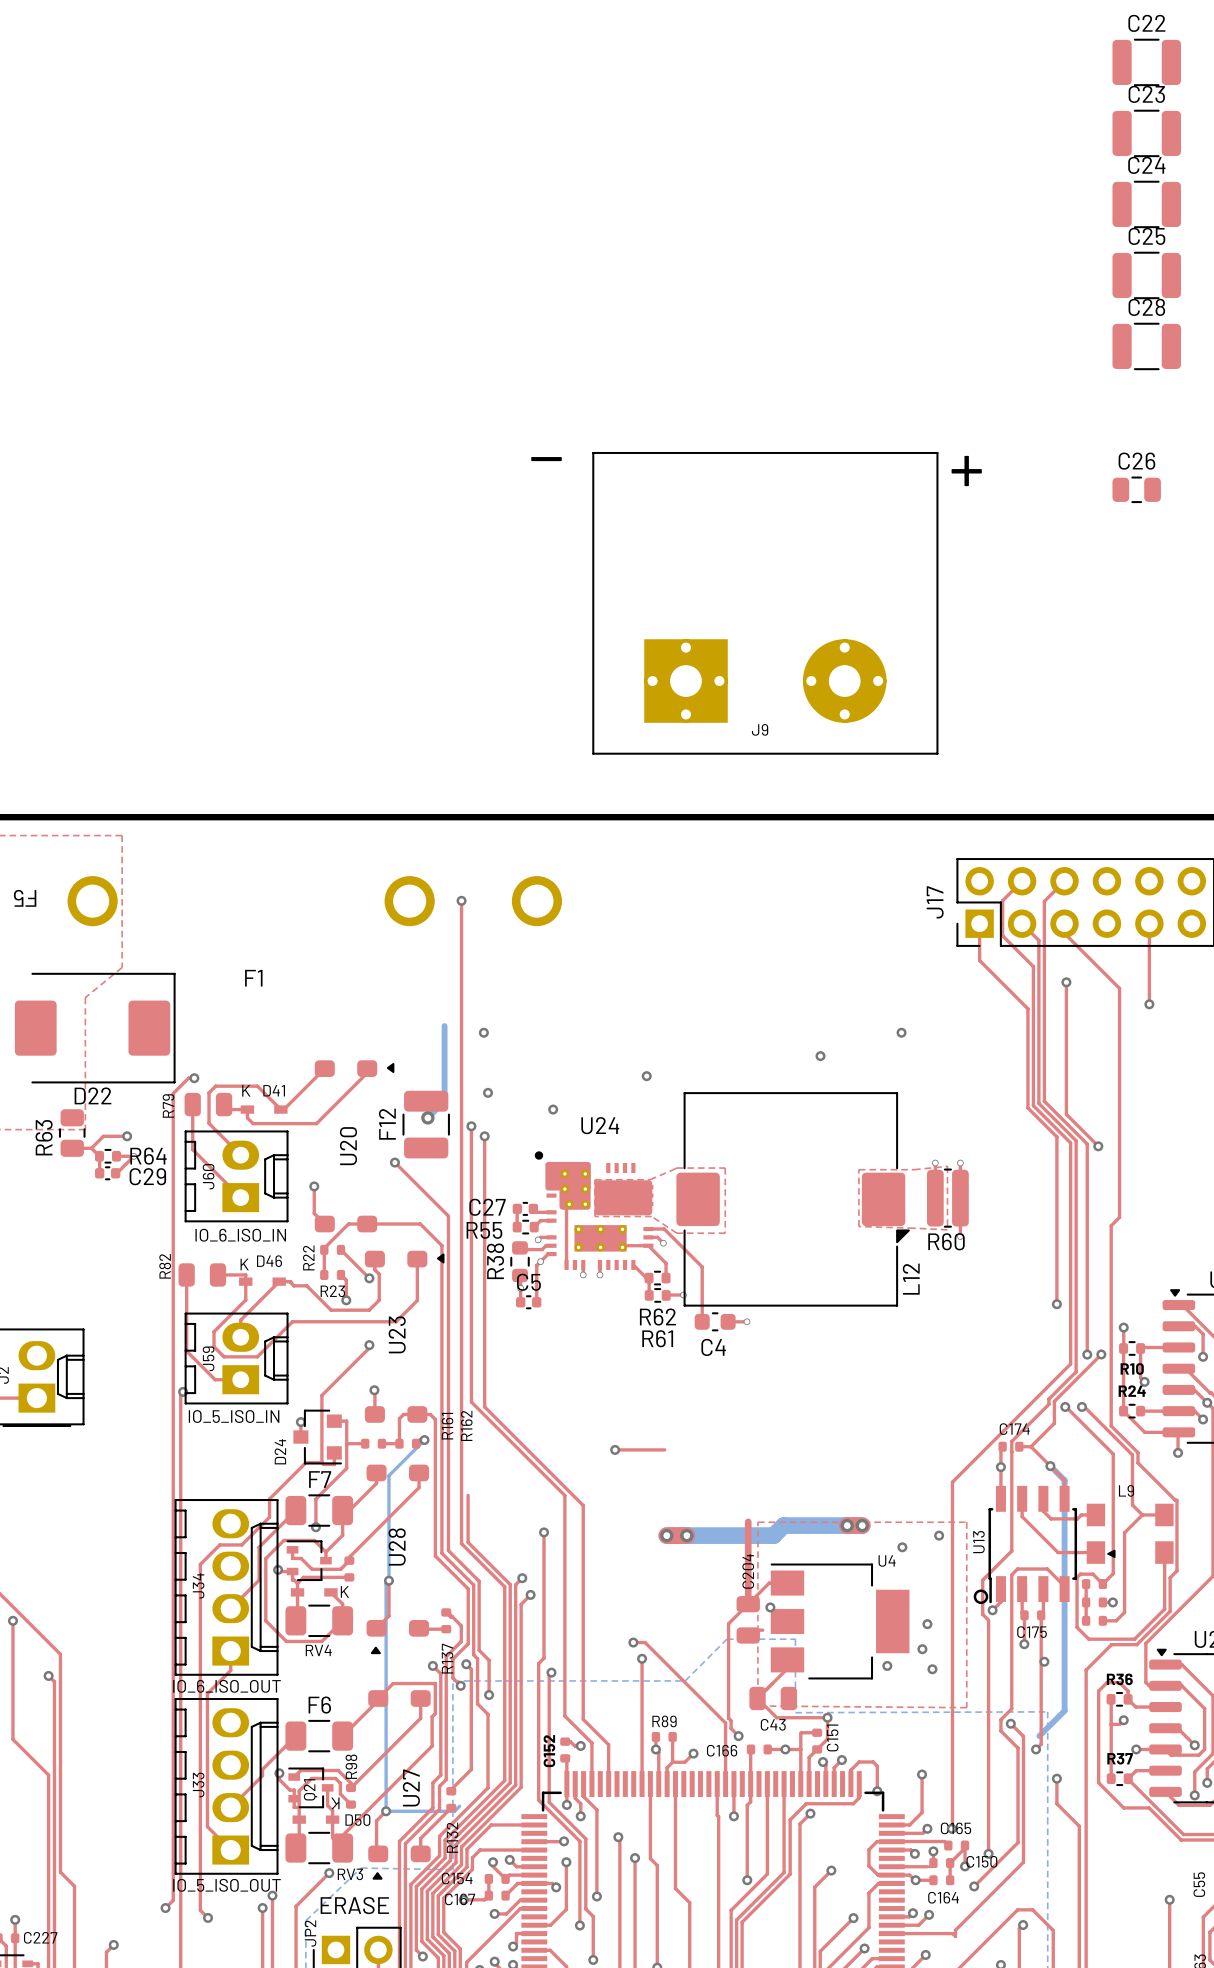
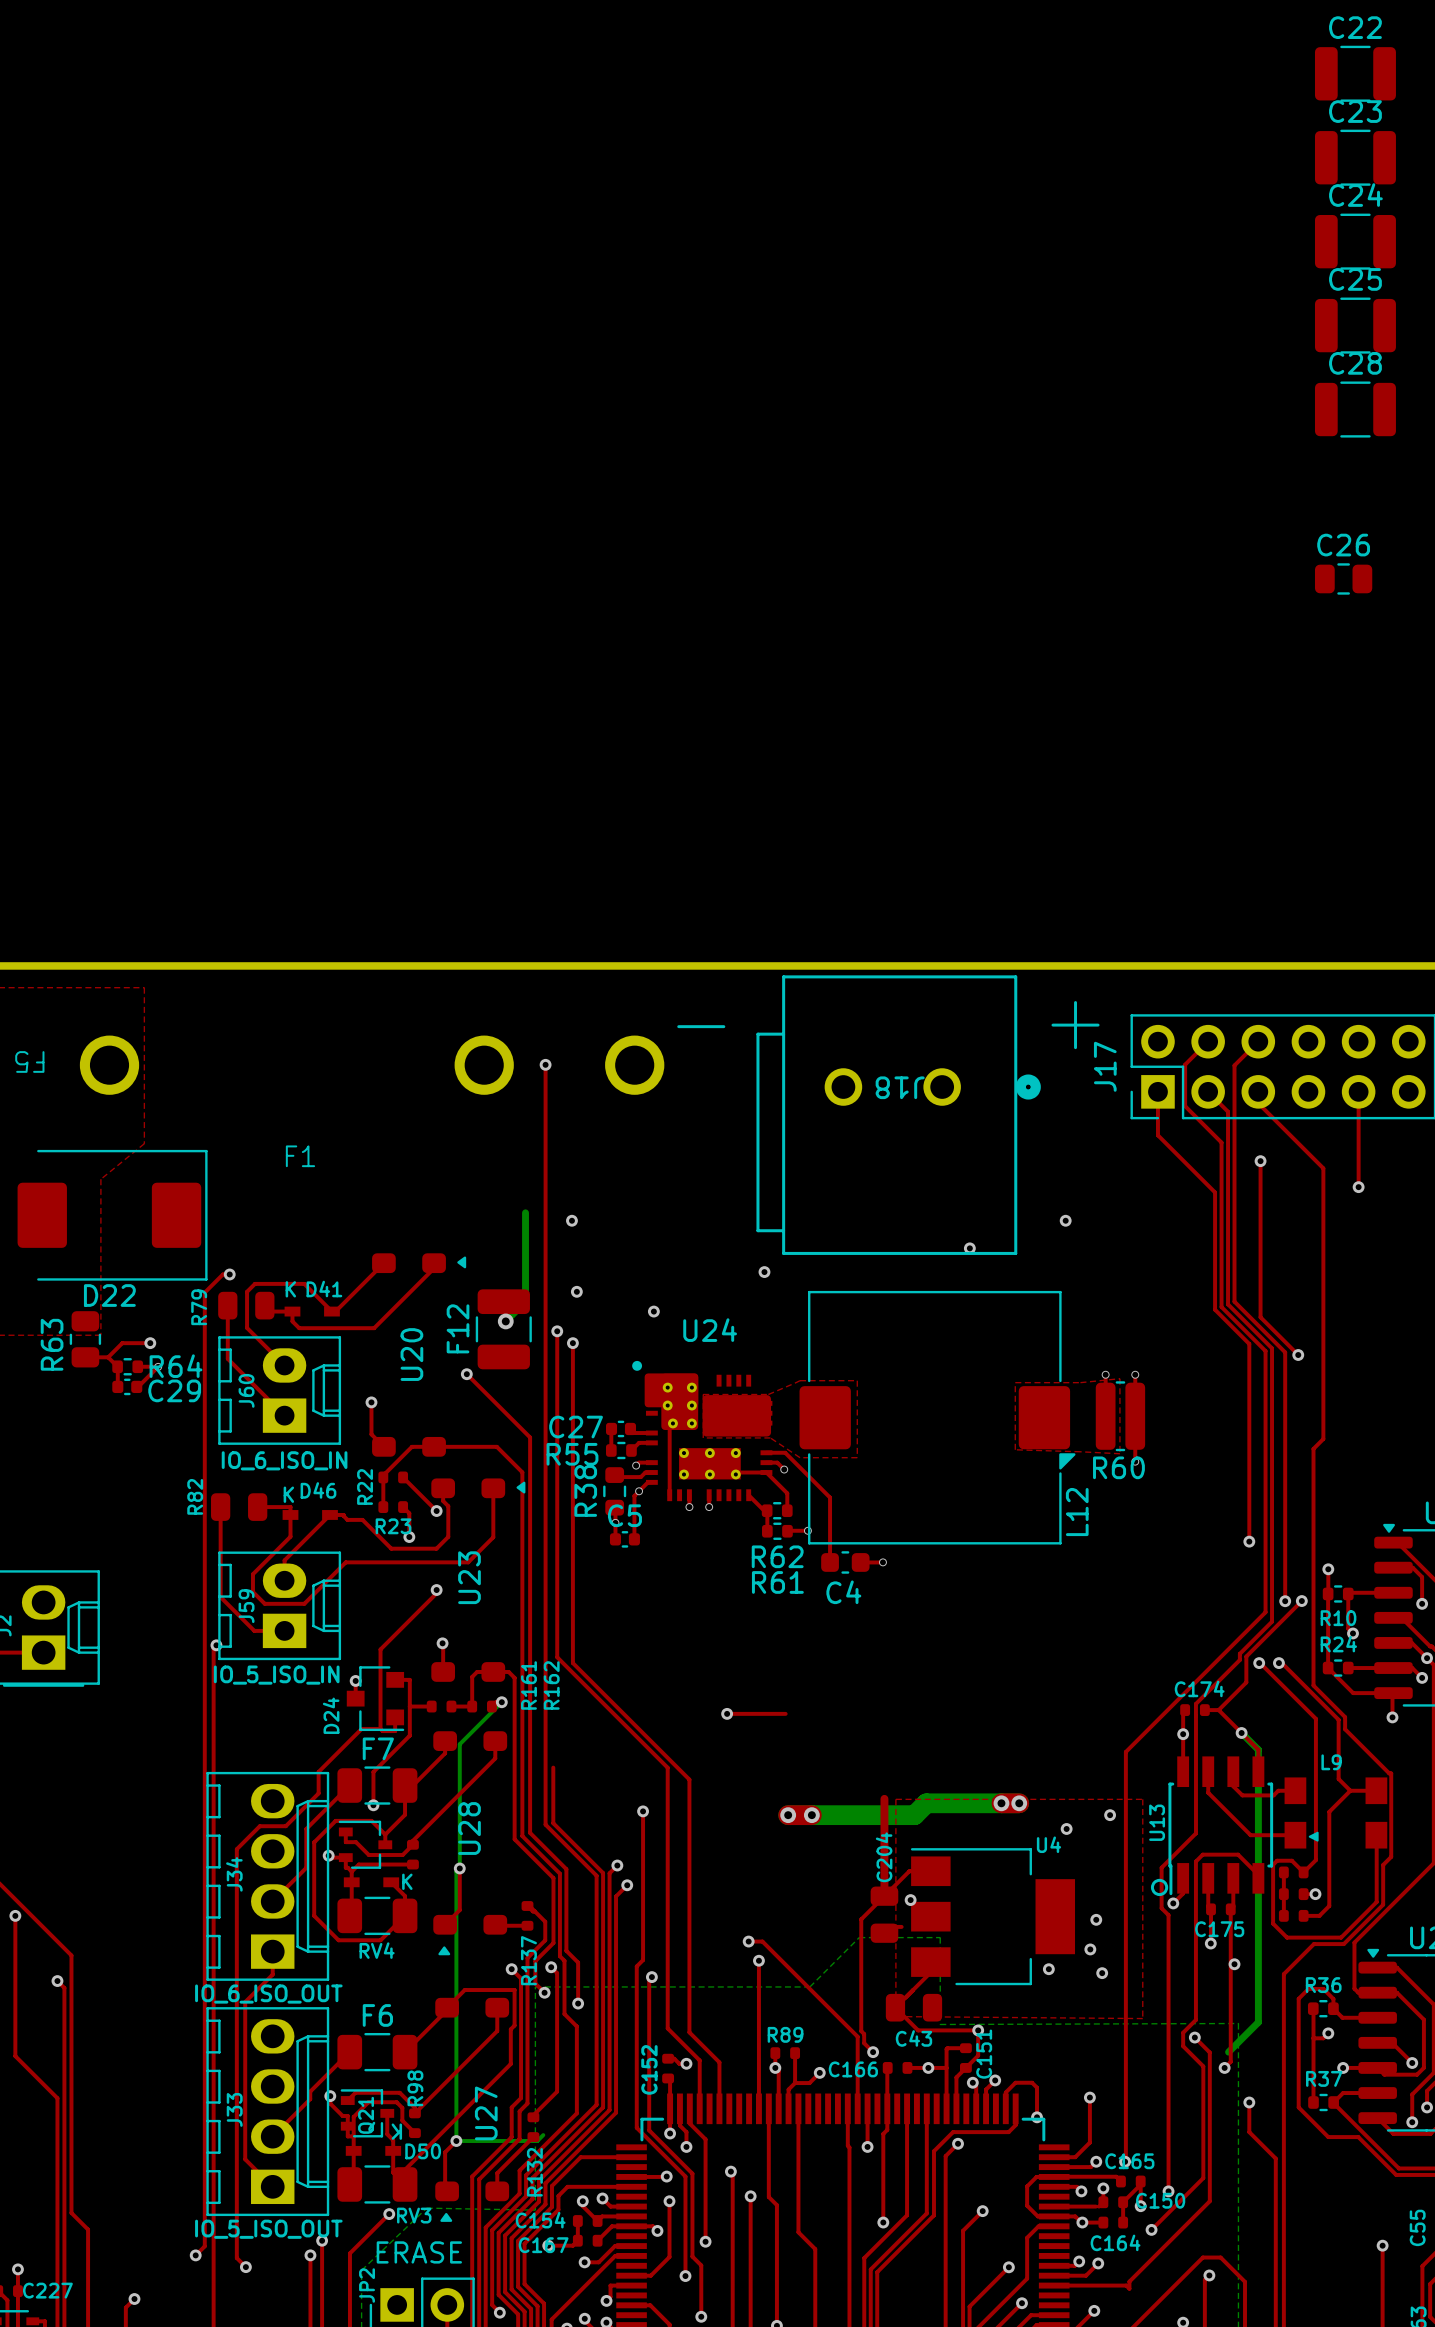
text position: _ (546, 459) -> _ (701, 1026)
text position: + (966, 471) -> + (1075, 1025)
J9: (765, 603) -> none
J18: none -> (898, 1115)

